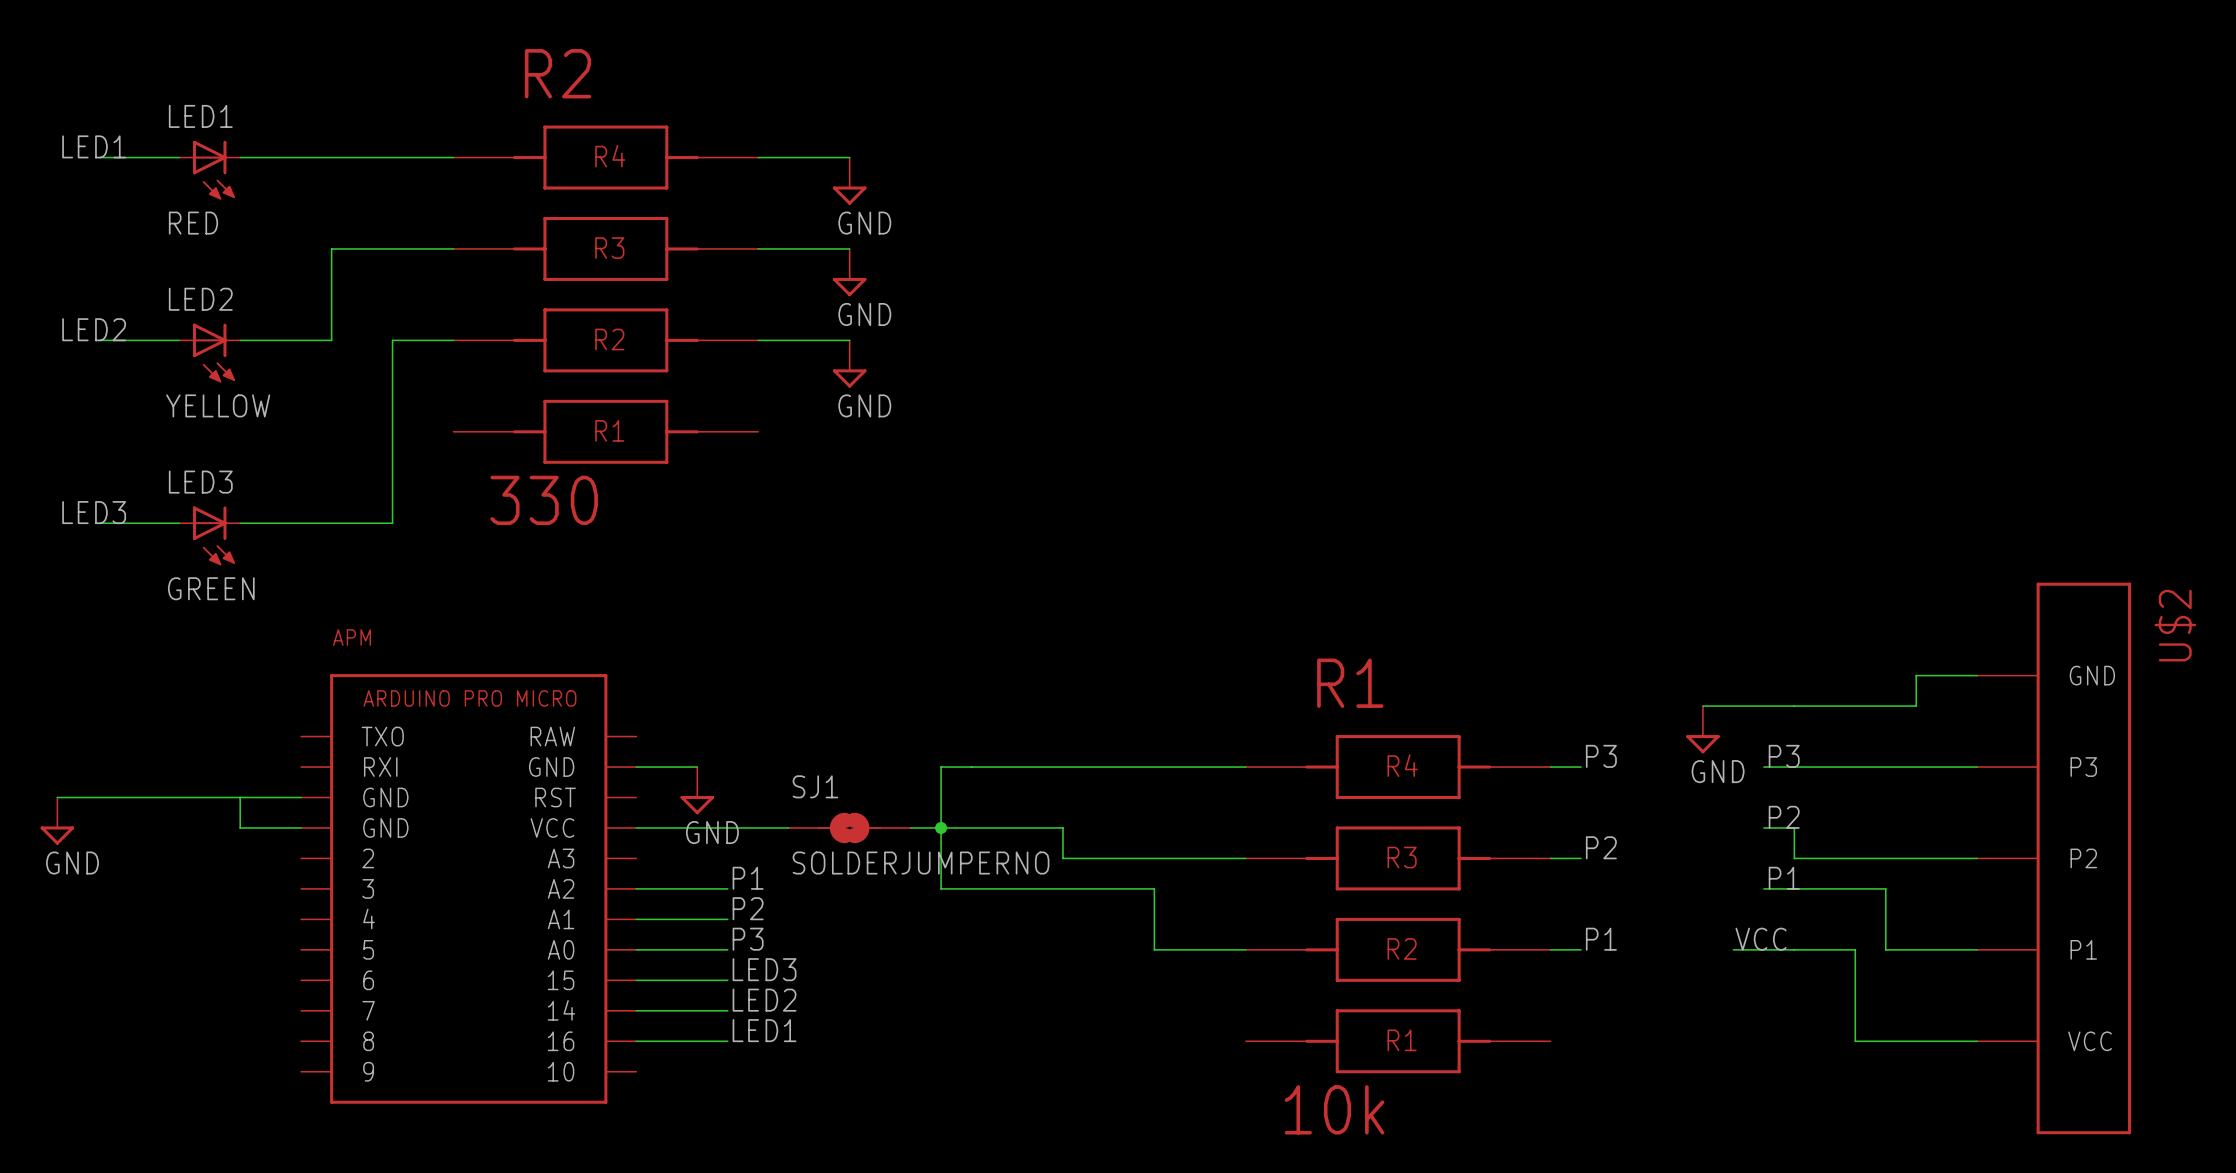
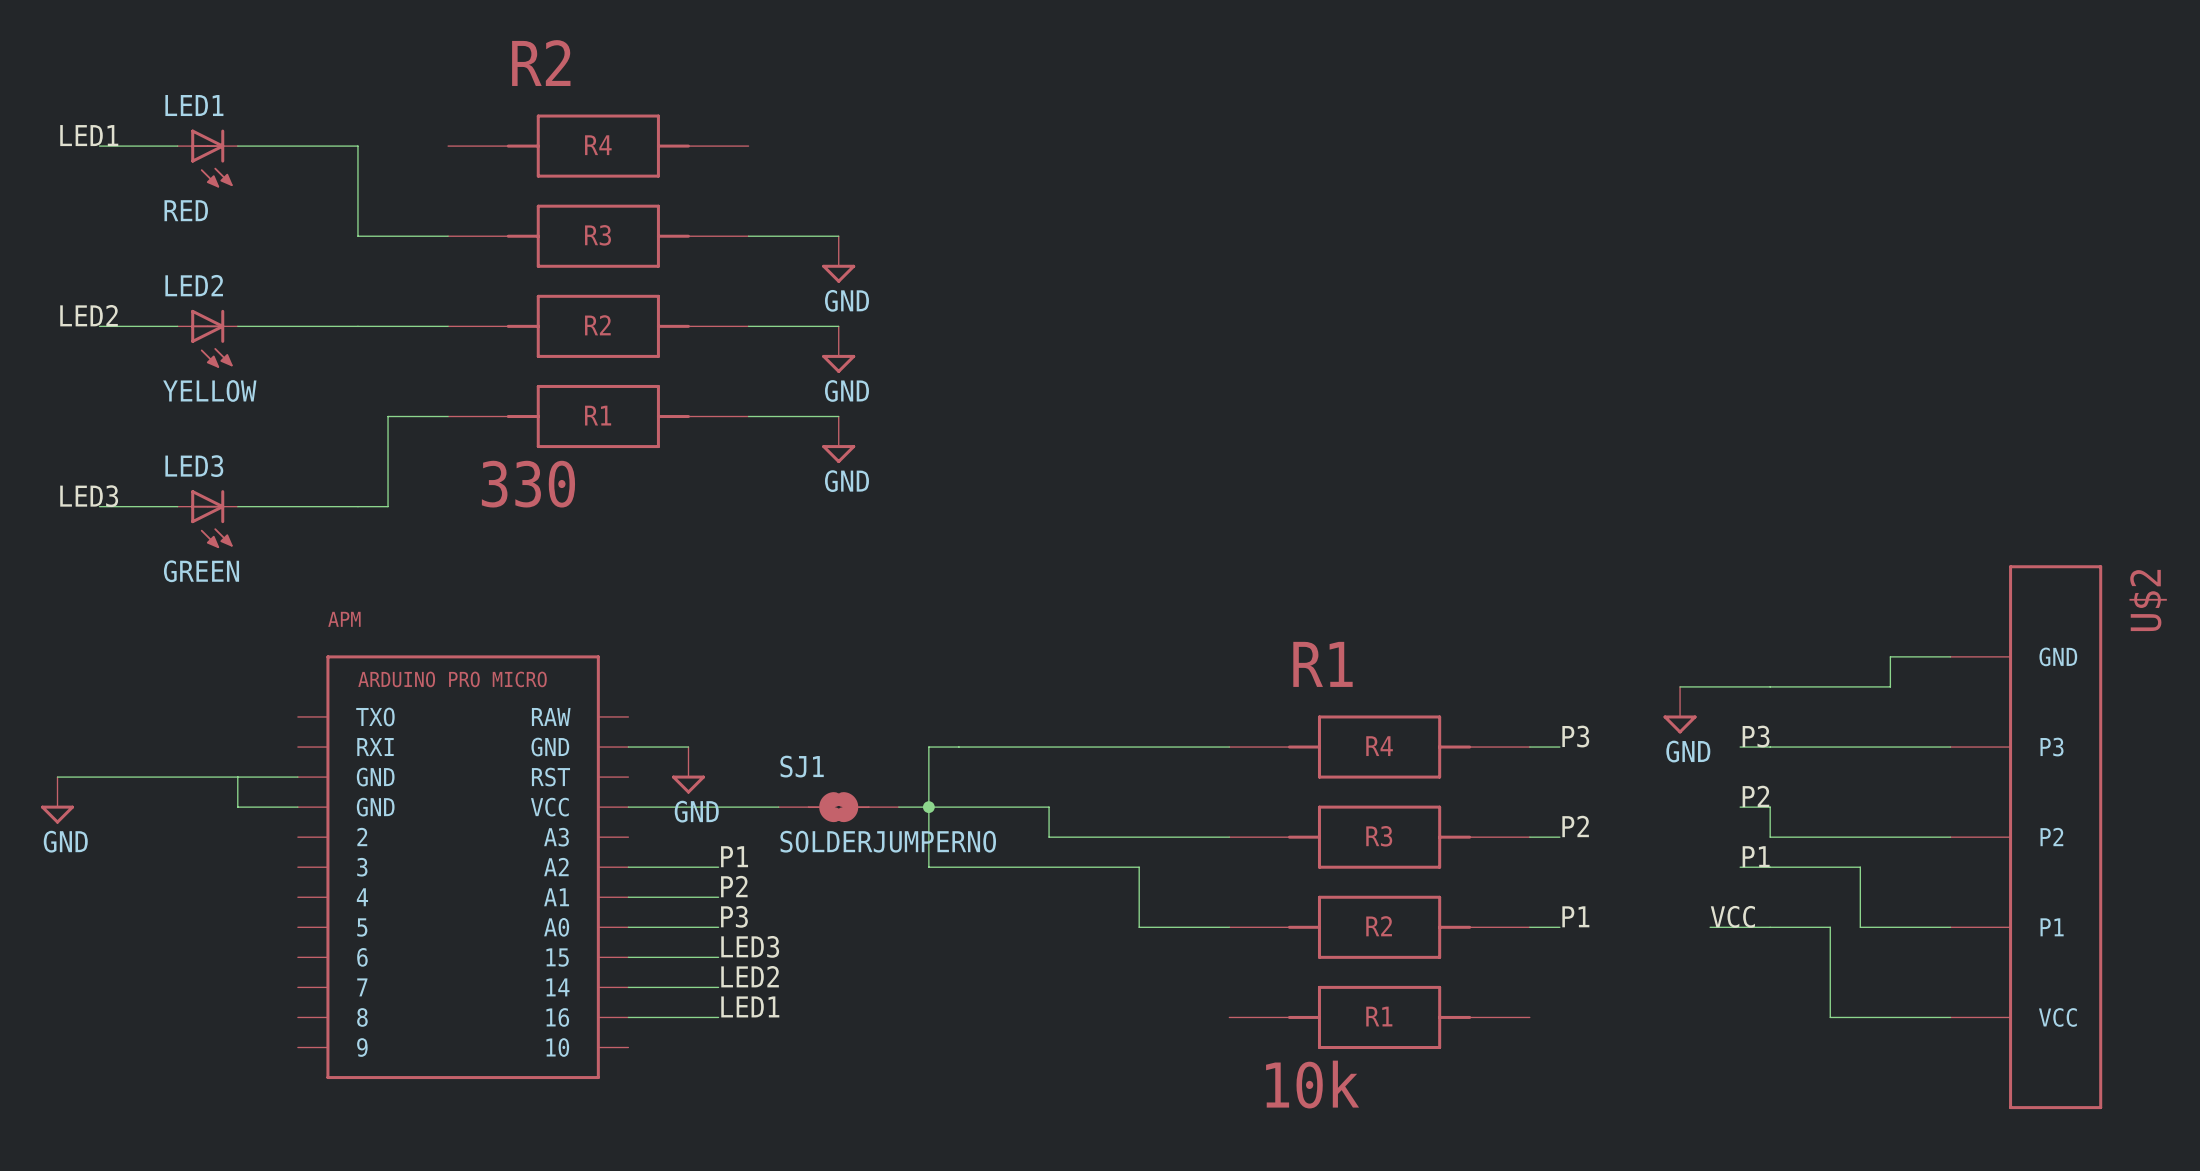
wire: (362, 157) (453, 157) -> (357, 146) (357, 236)
wire: (758, 157) (849, 157) -> (748, 416) (838, 416)
power symbol position: GND (849, 181) -> GND (838, 439)
wire: (362, 248) (331, 248) (331, 340) -> (388, 326) (327, 326)
wire: (392, 340) (392, 431) -> (448, 416) (388, 416)

